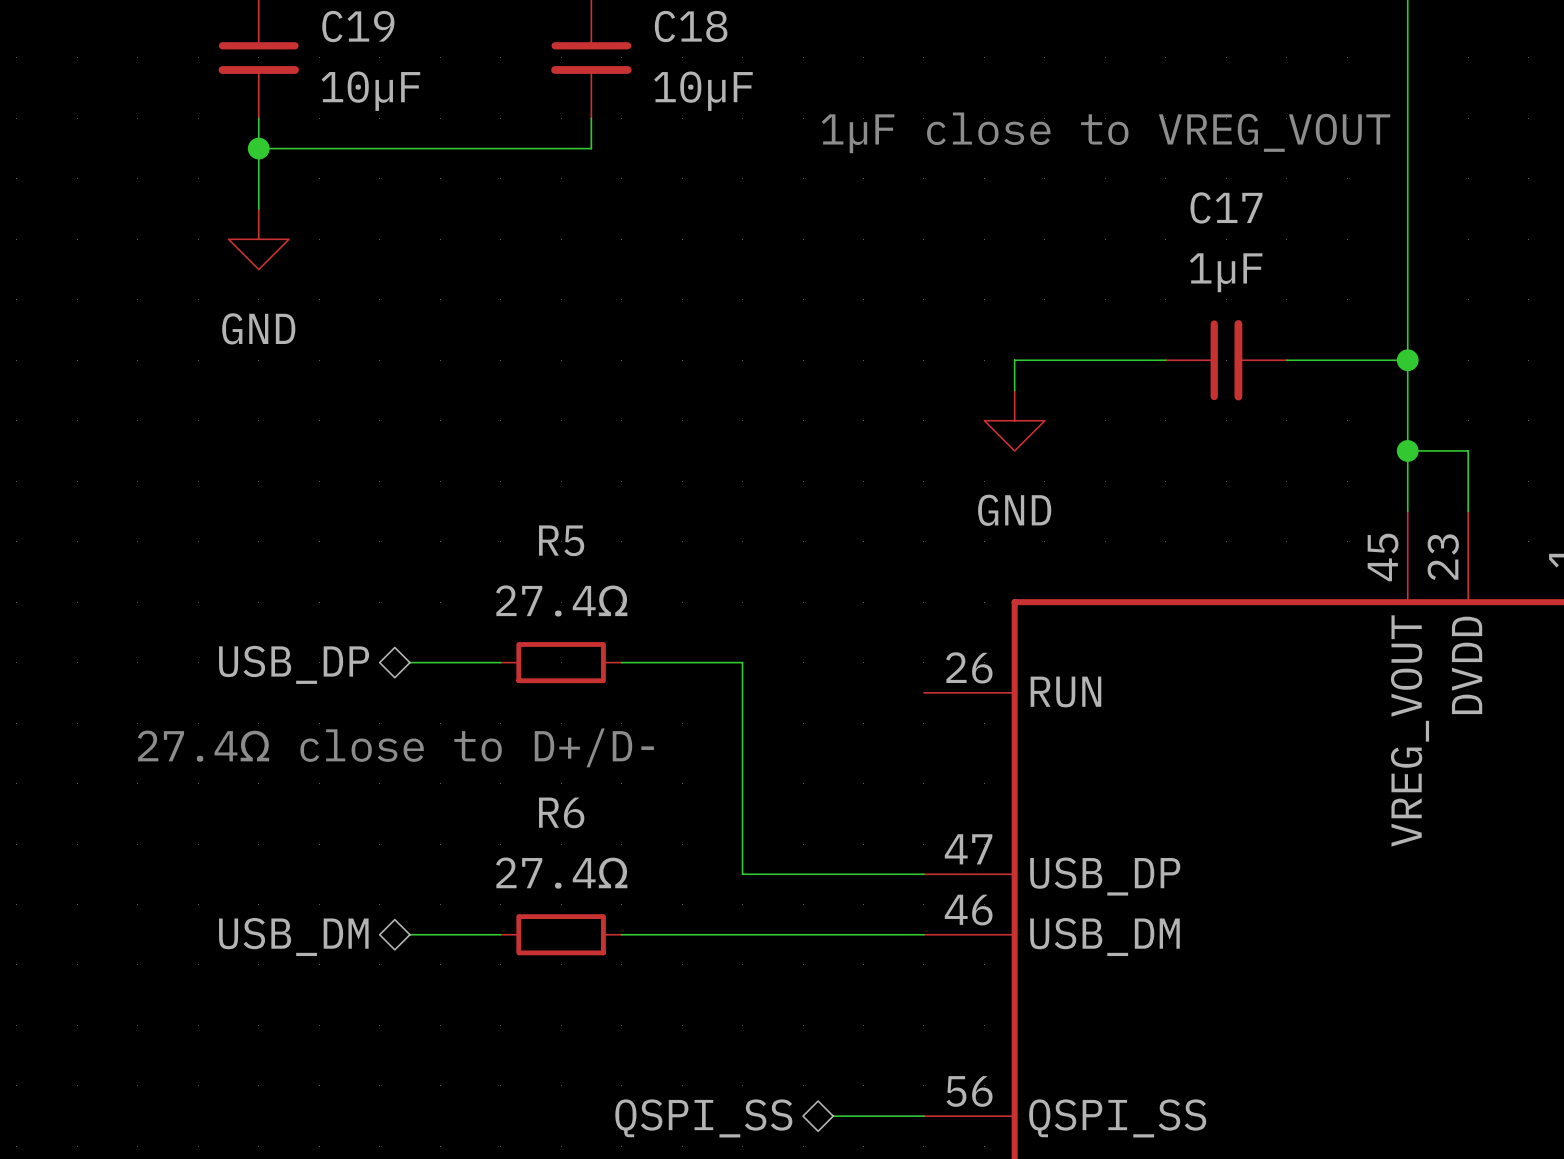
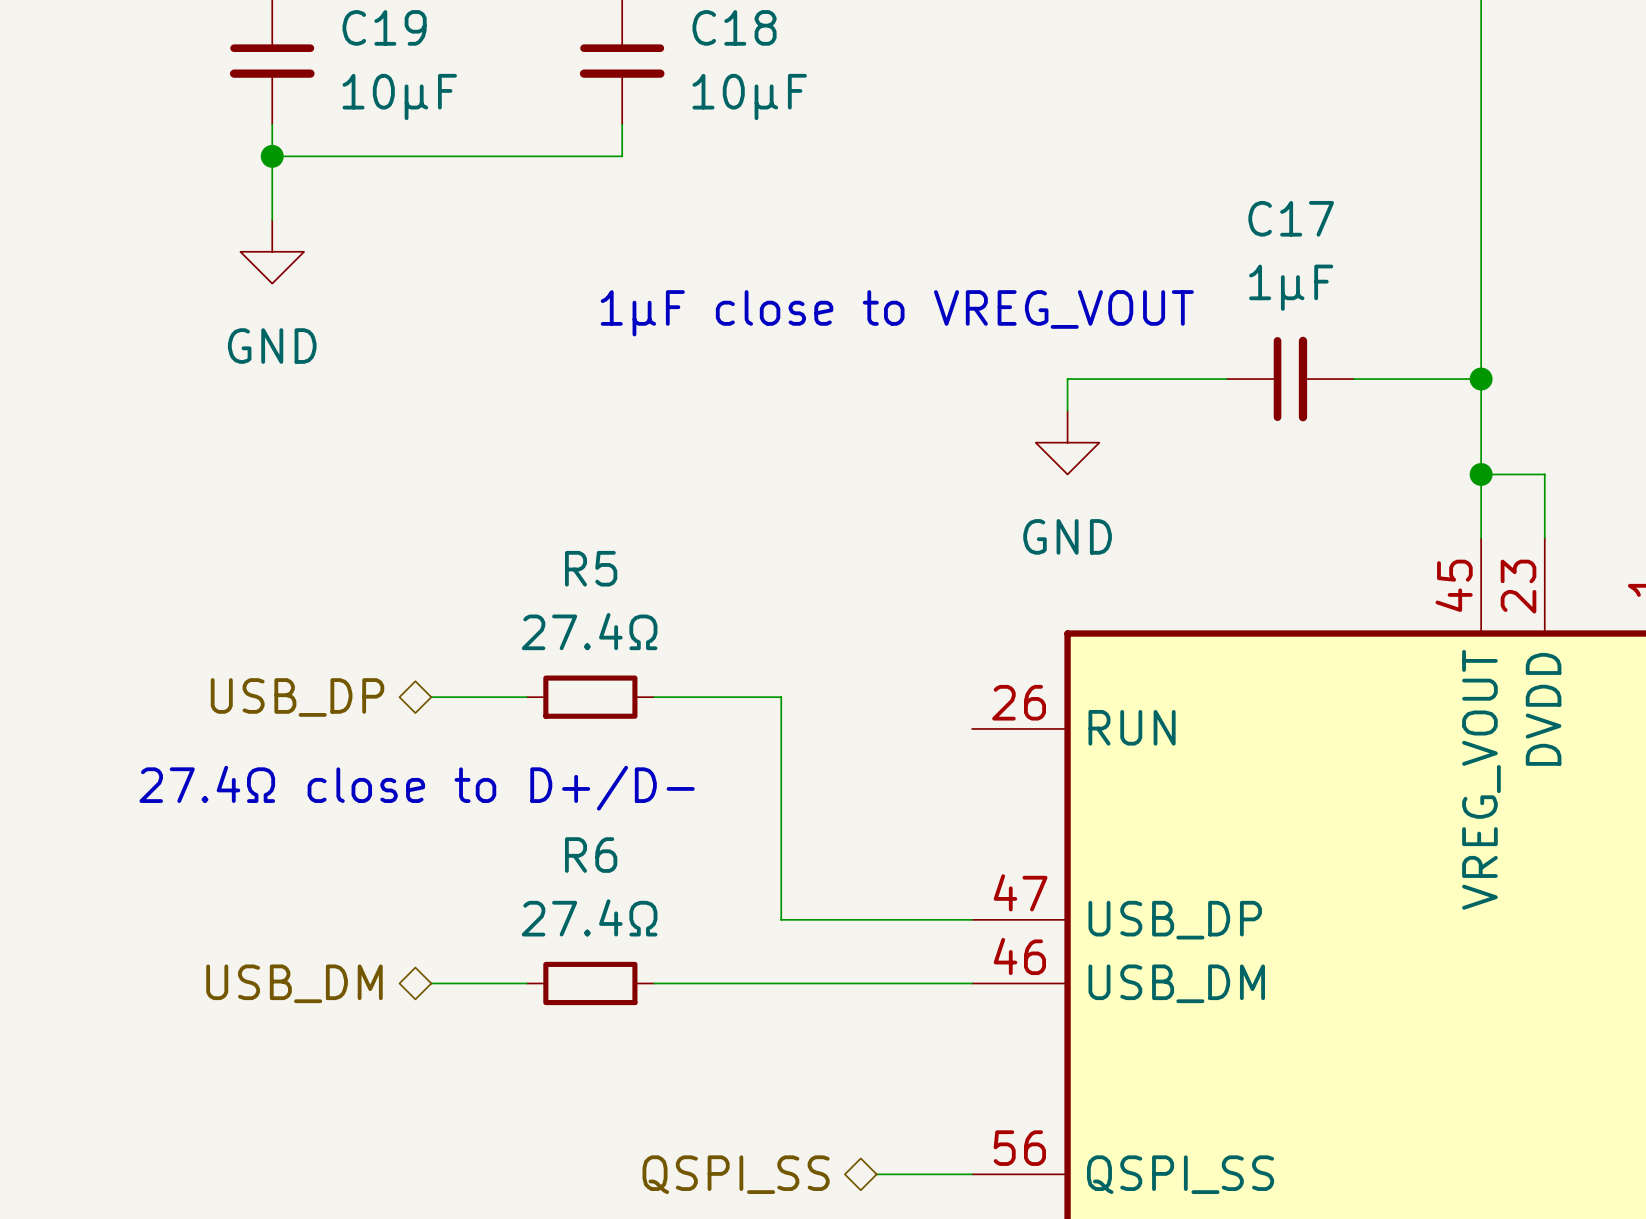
text position: 1µF close to VREG_VOUT (1105, 132) -> 1µF close to VREG_VOUT (897, 313)

